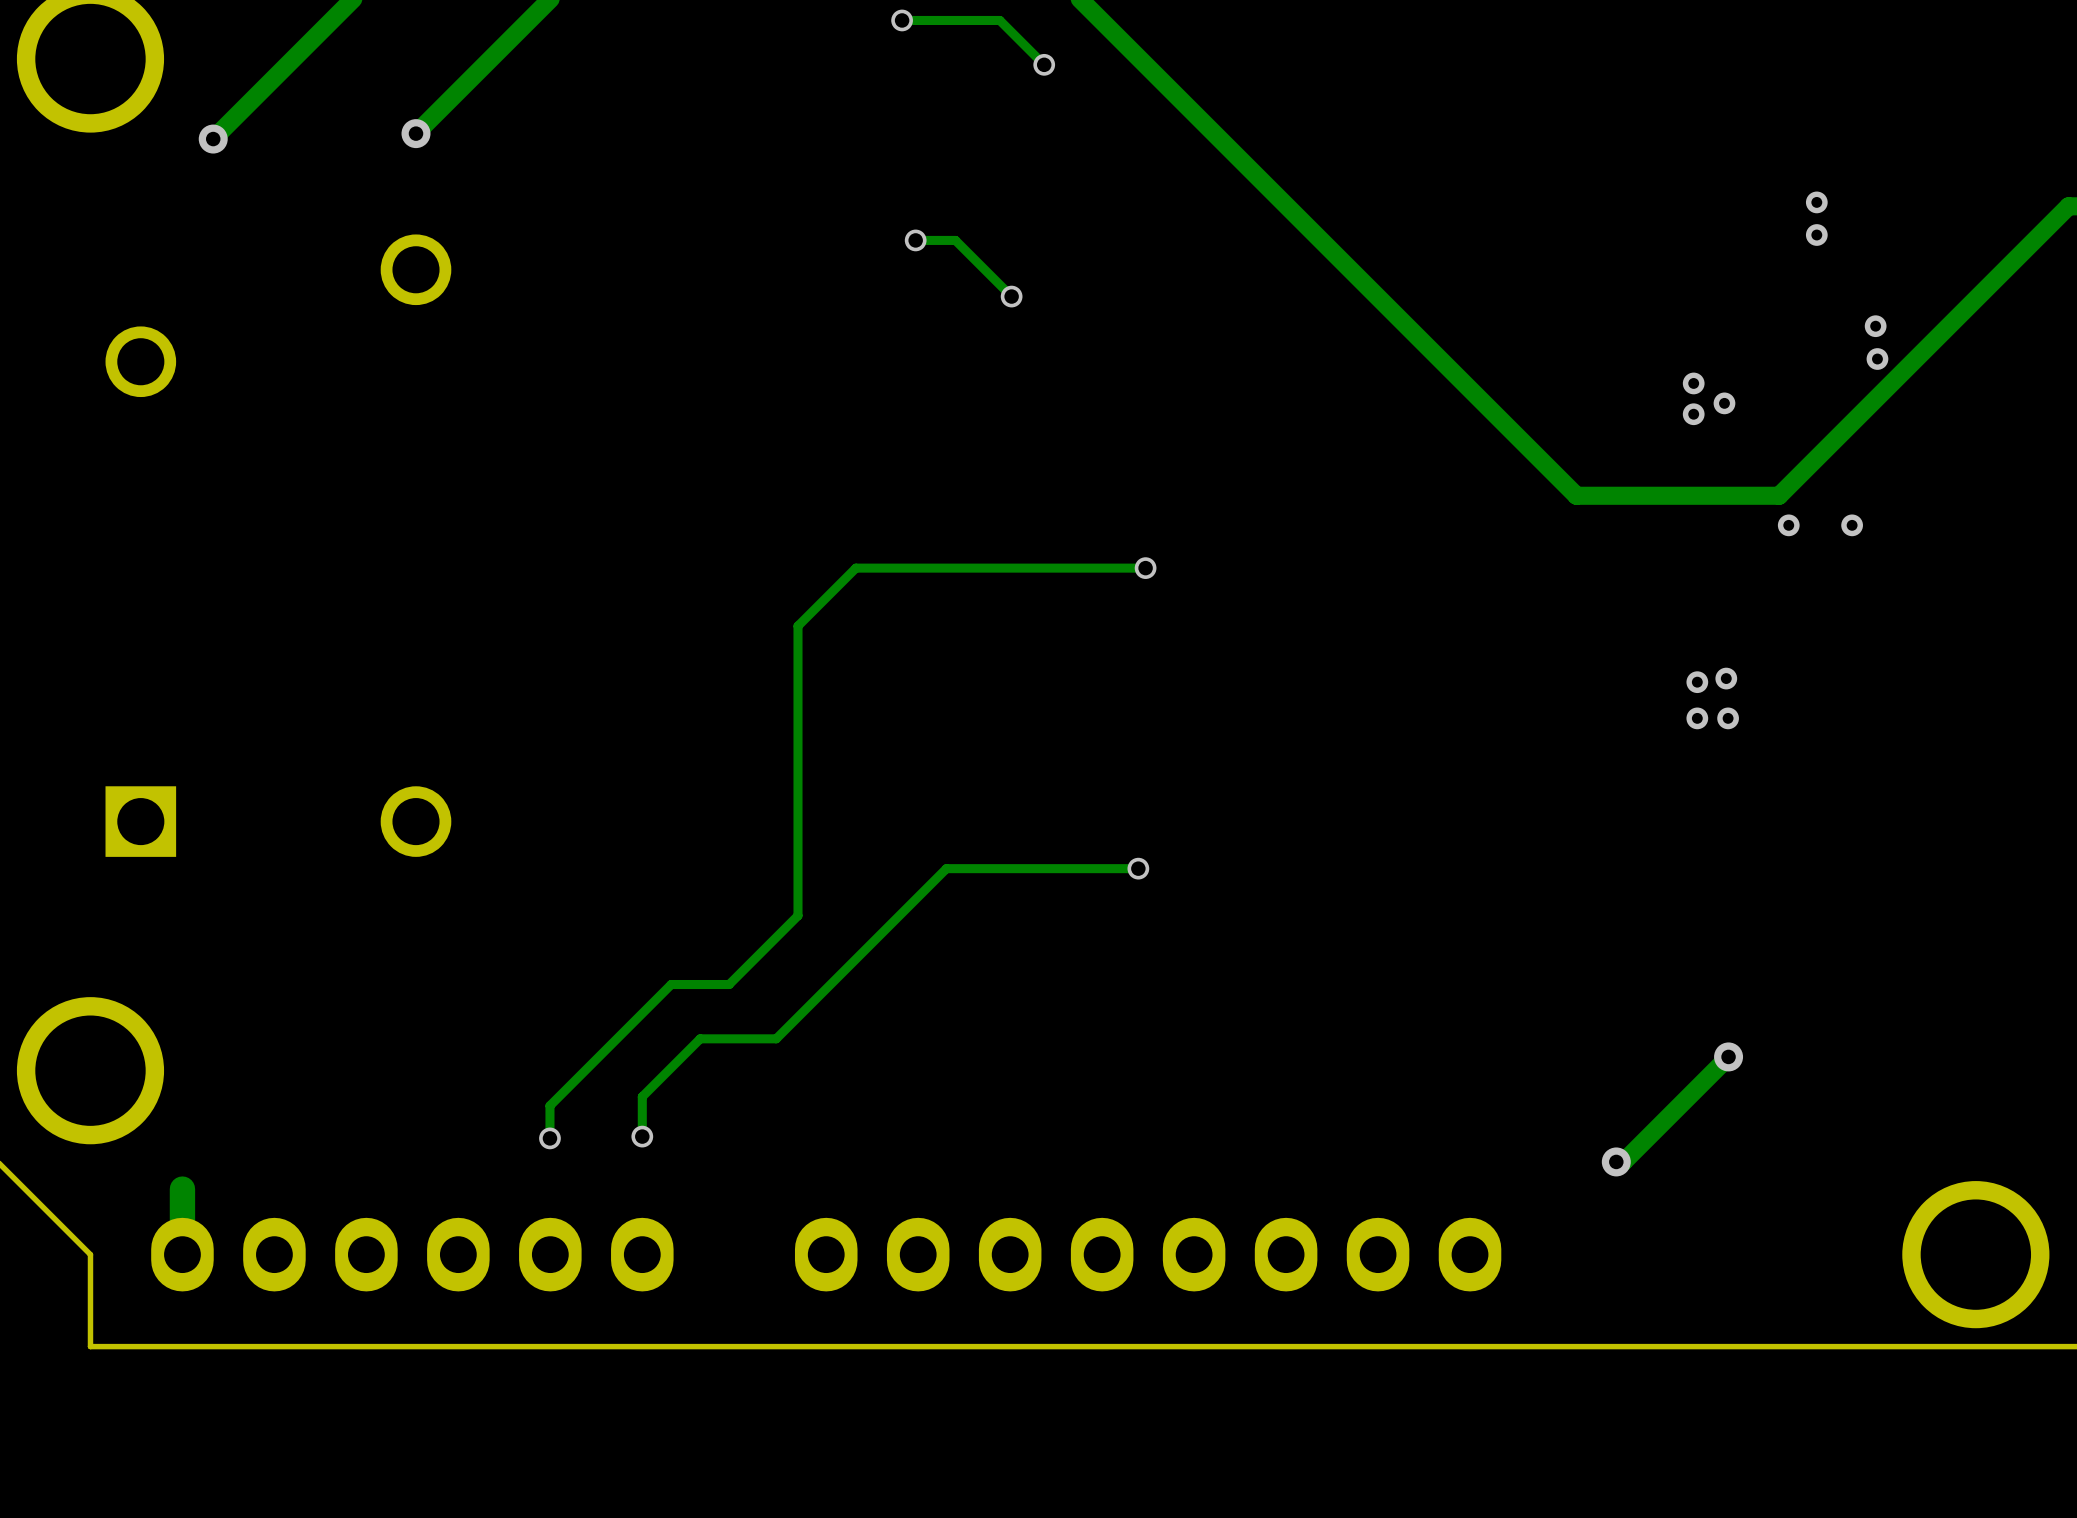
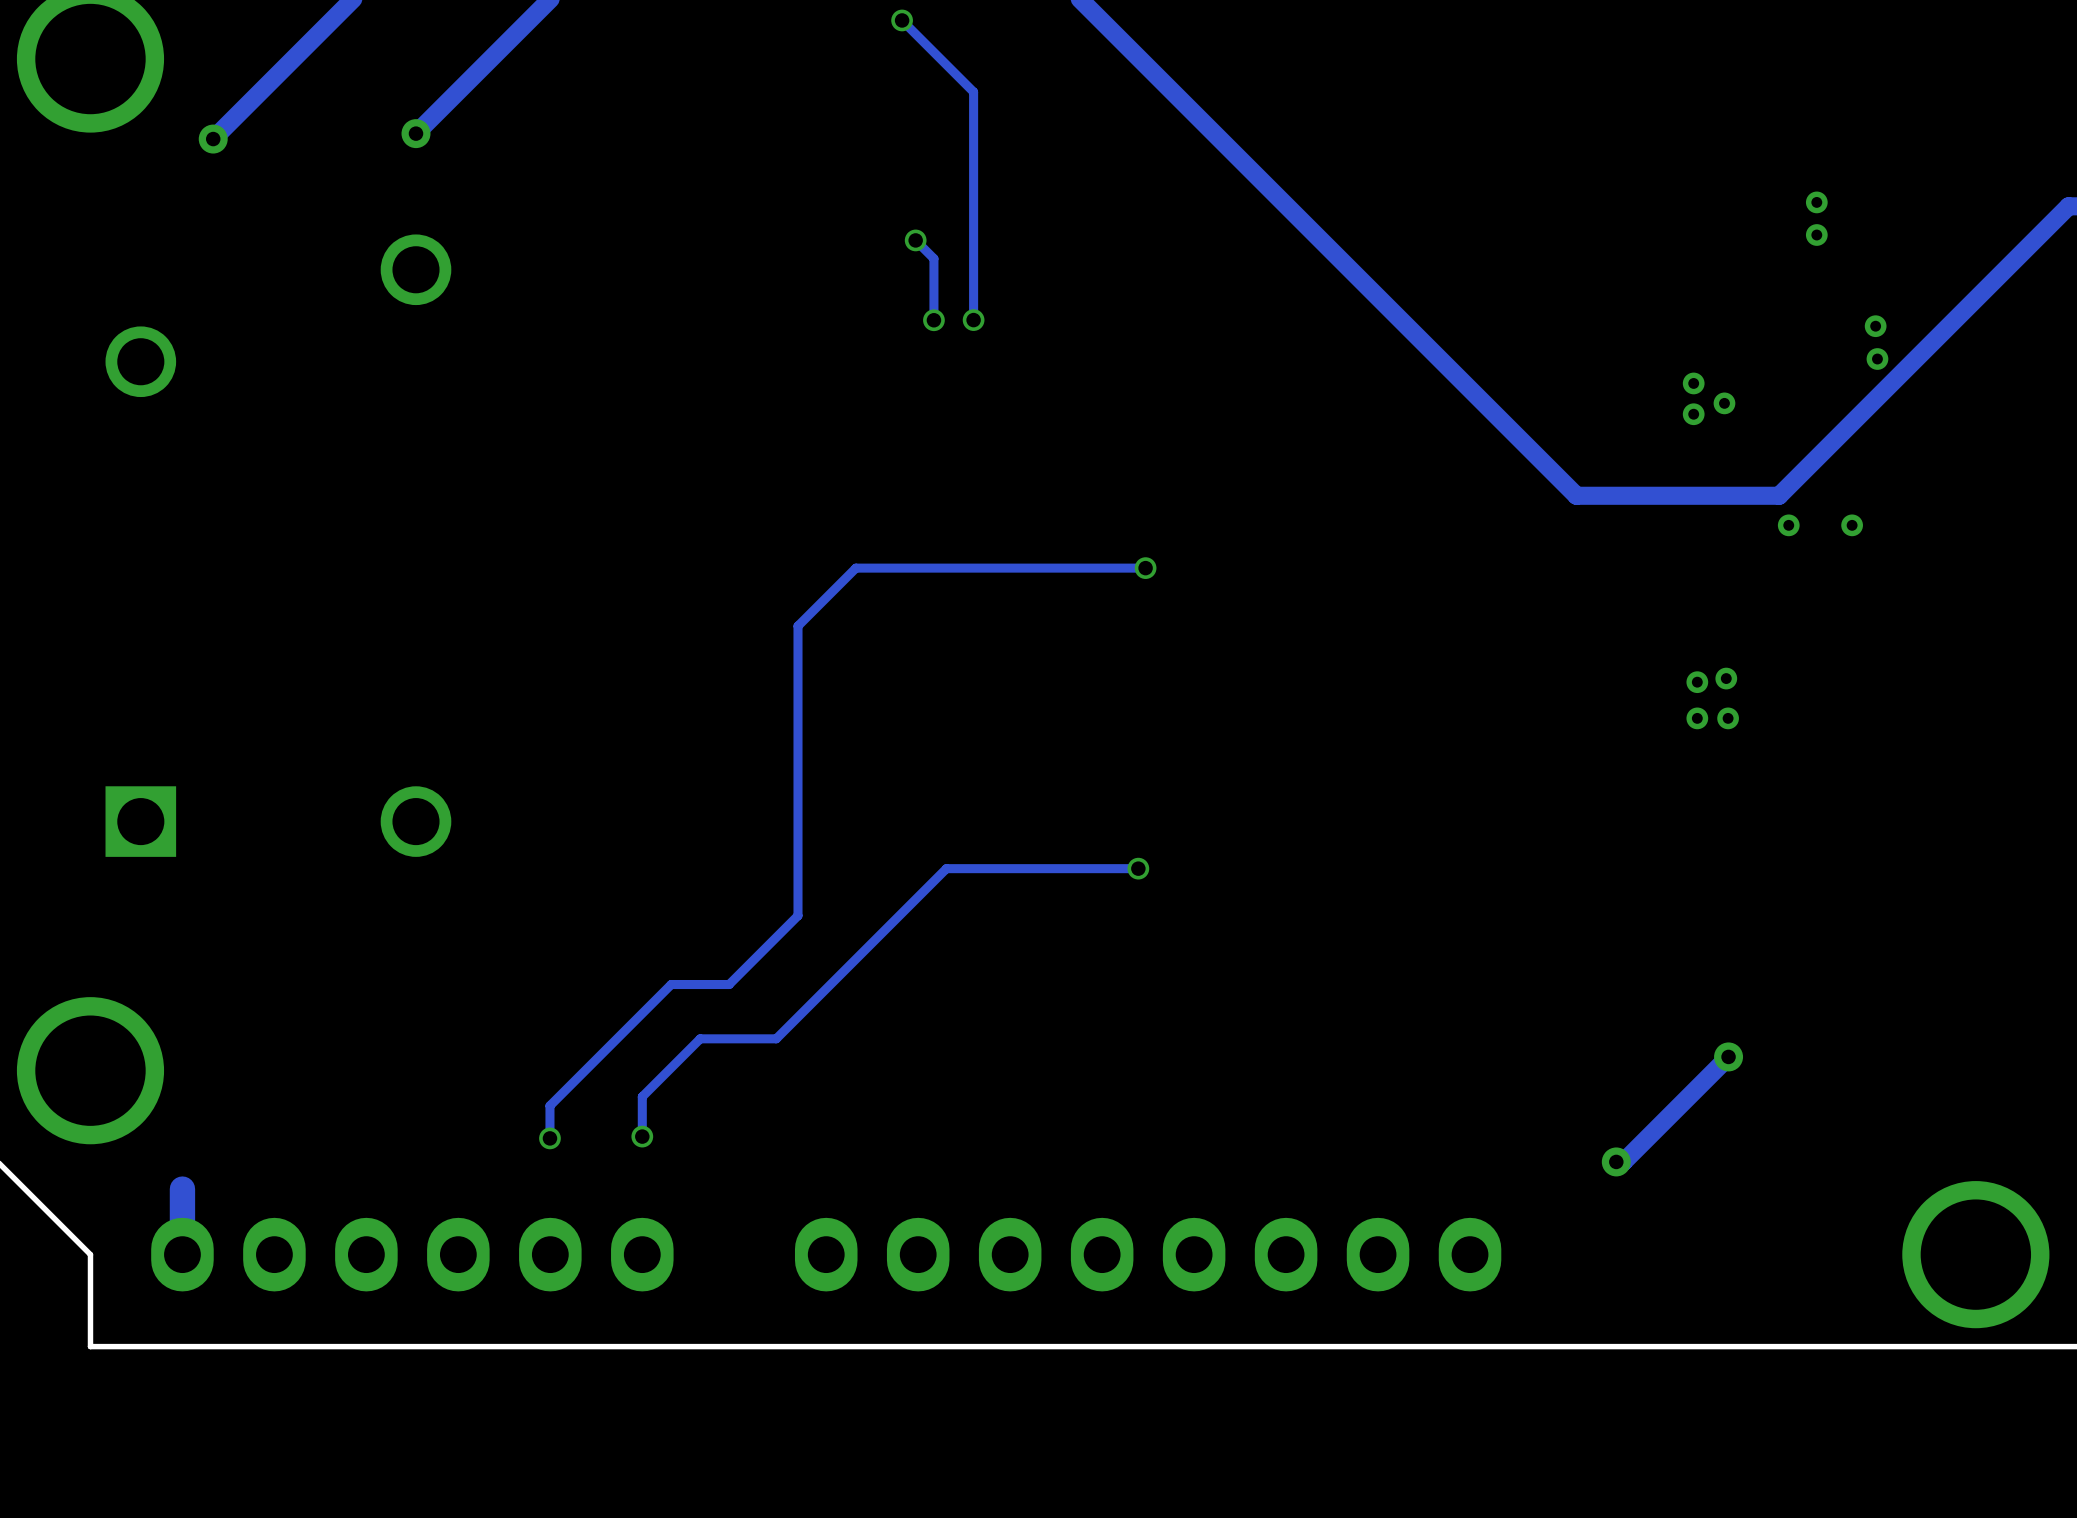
track: (902, 20) (999, 20) (1044, 64) -> (902, 20) (973, 91) (973, 320)
via: (1044, 64) -> none
track: (915, 240) (955, 240) (1011, 296) -> (915, 240) (933, 258) (933, 320)
via: (1011, 296) -> none
via: none -> (933, 320)
via: none -> (973, 320)

